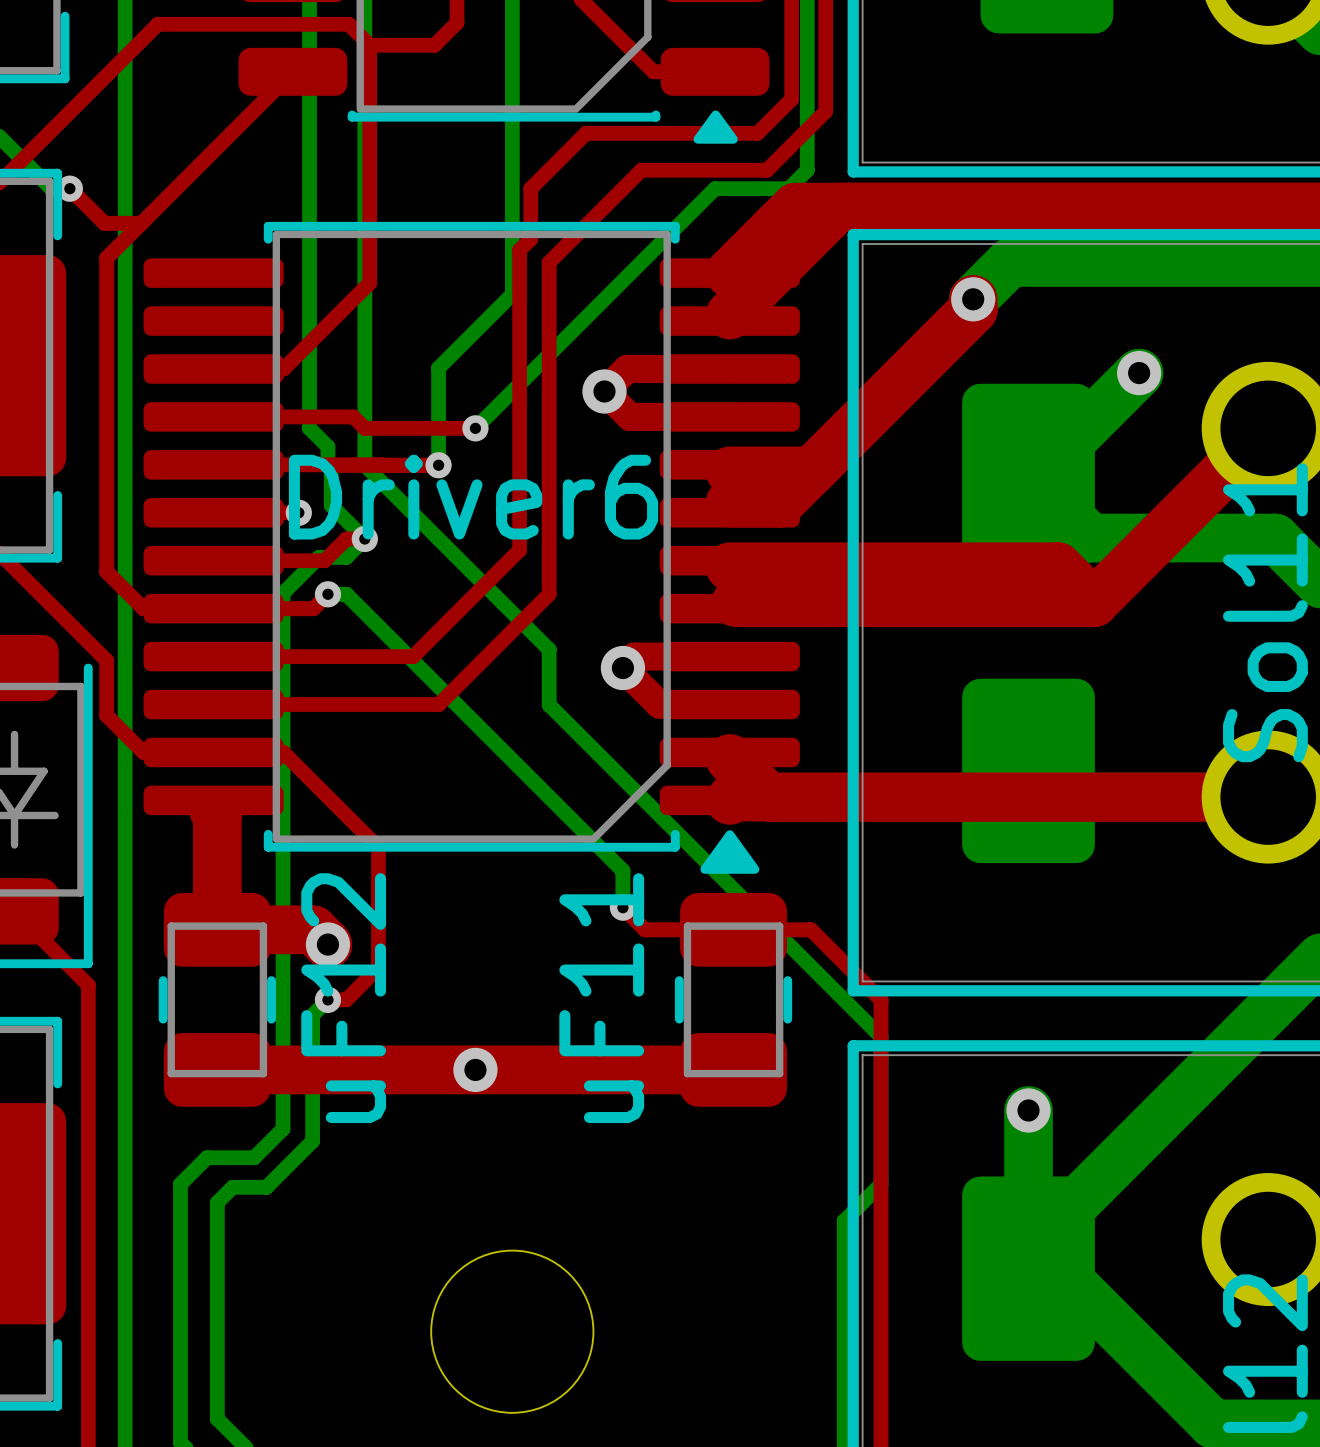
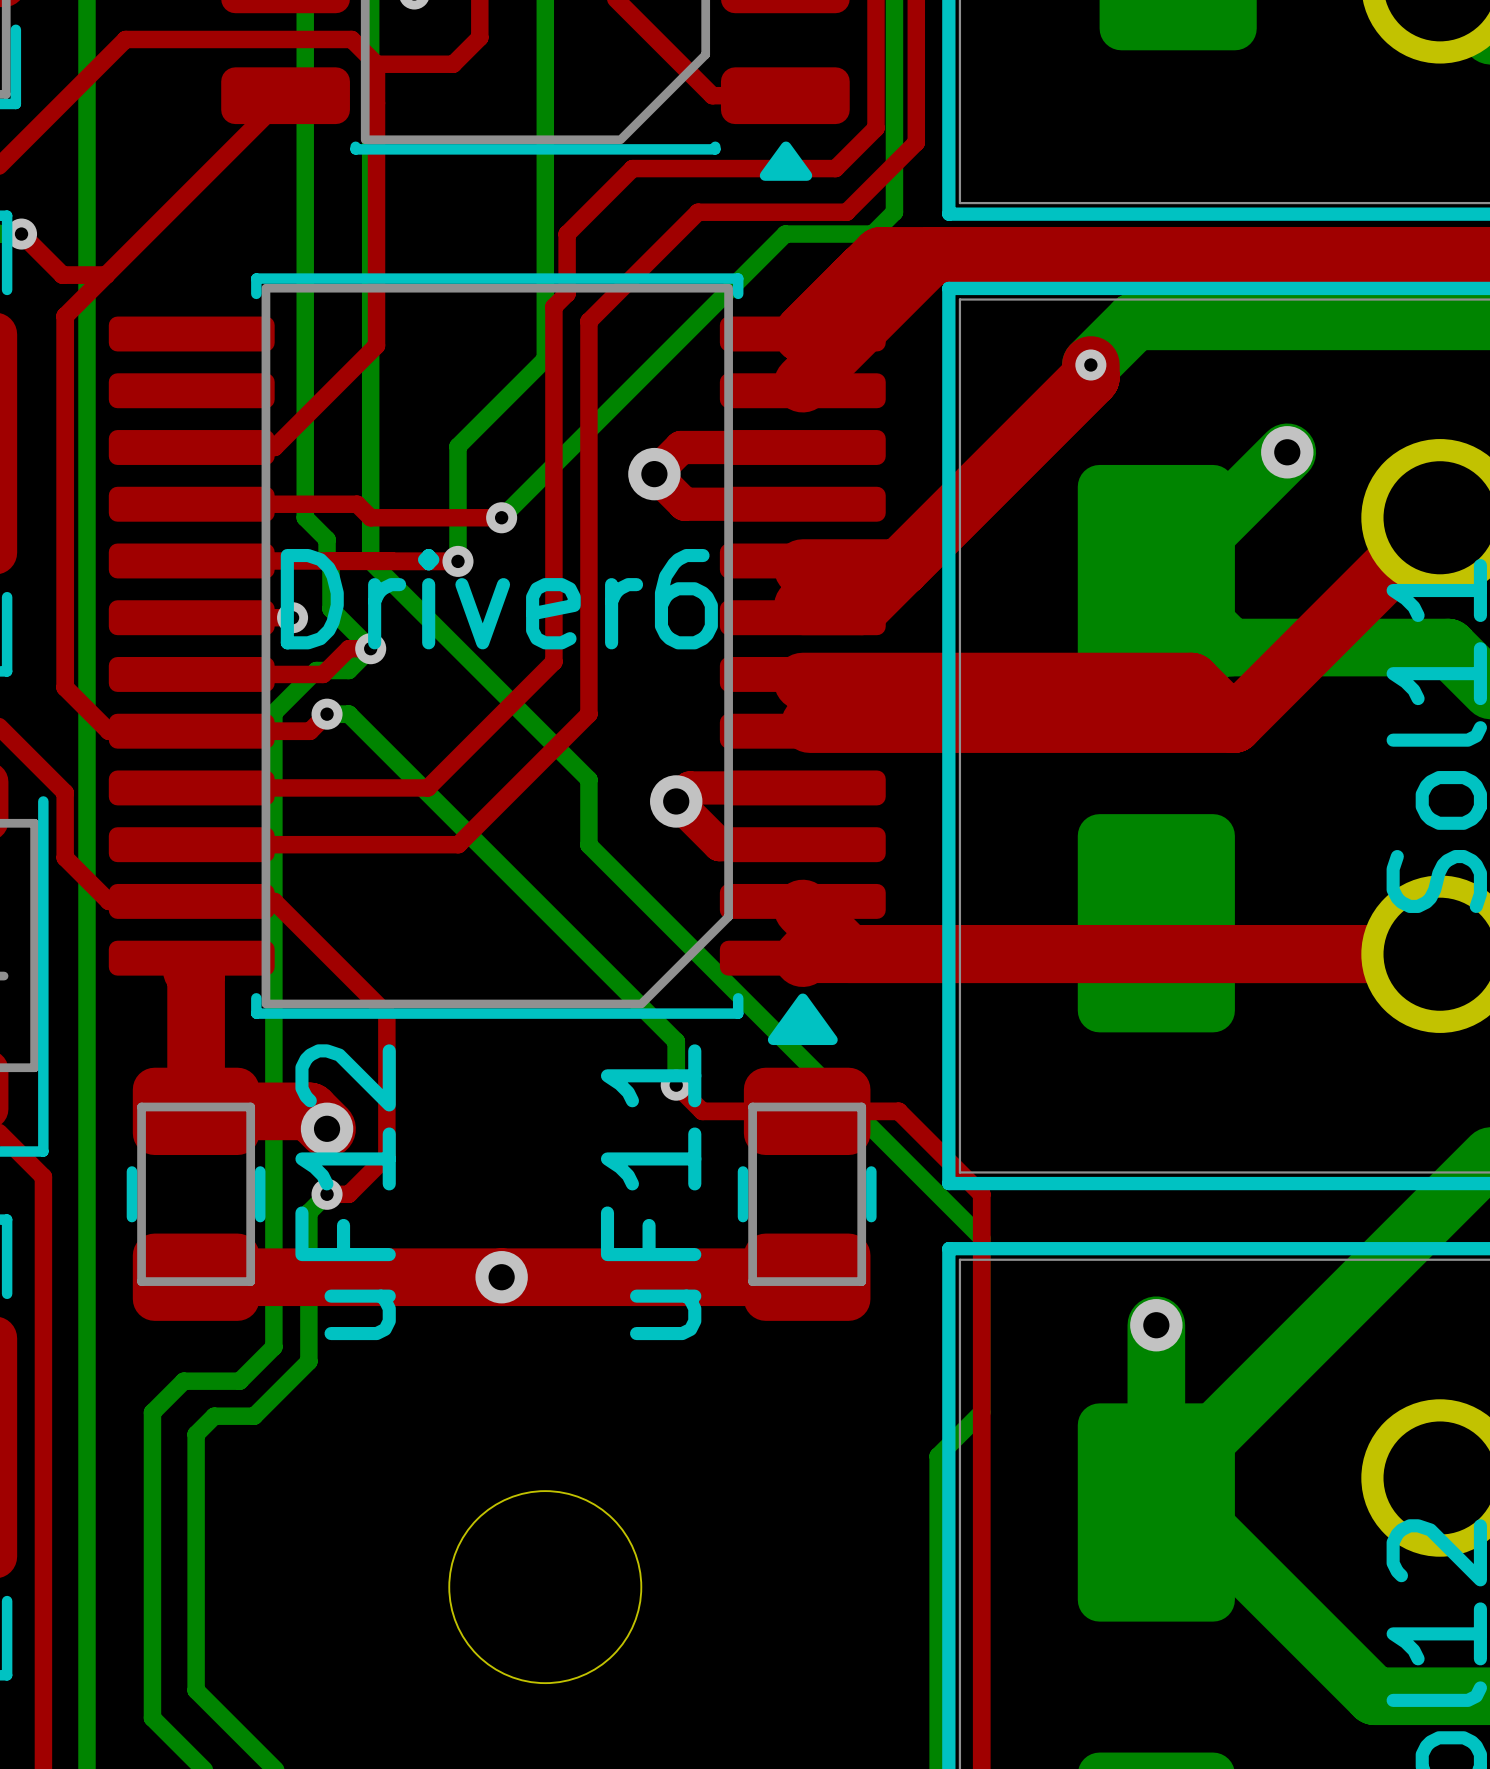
via size: [951, 277, 996, 322] -> [1075, 349, 1107, 381]

